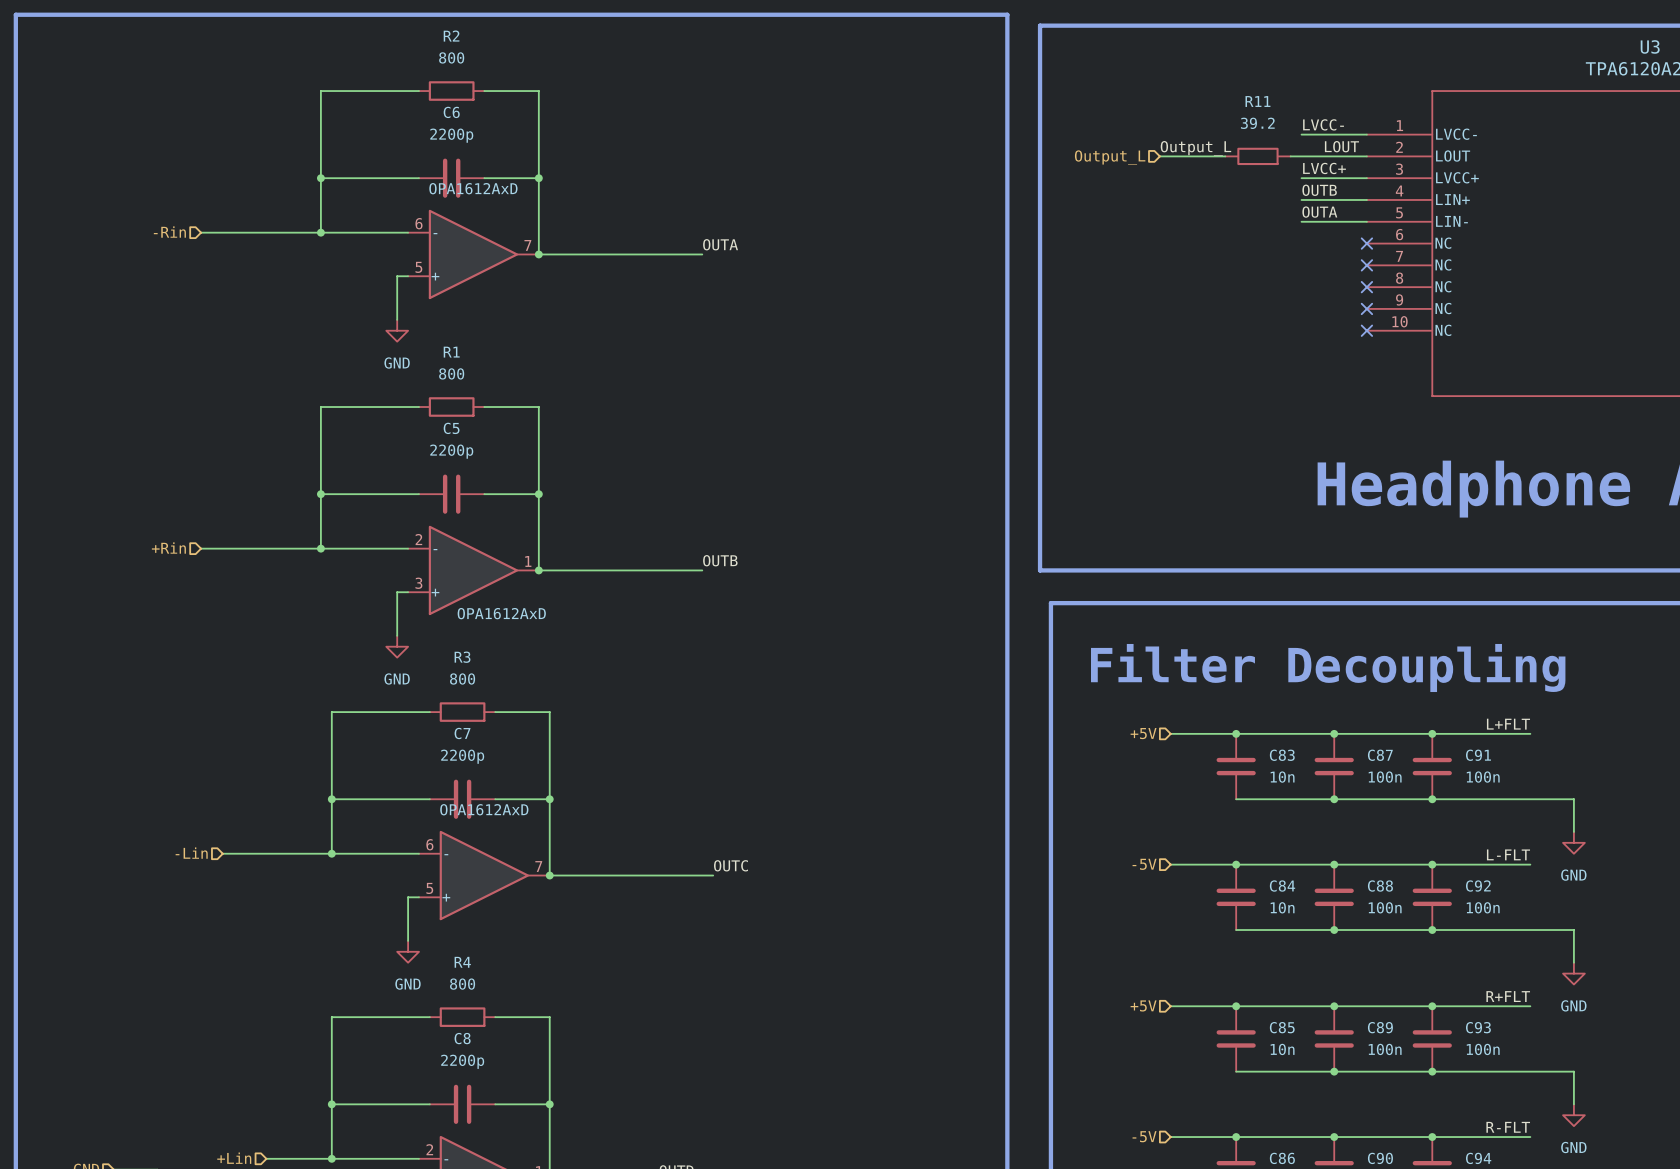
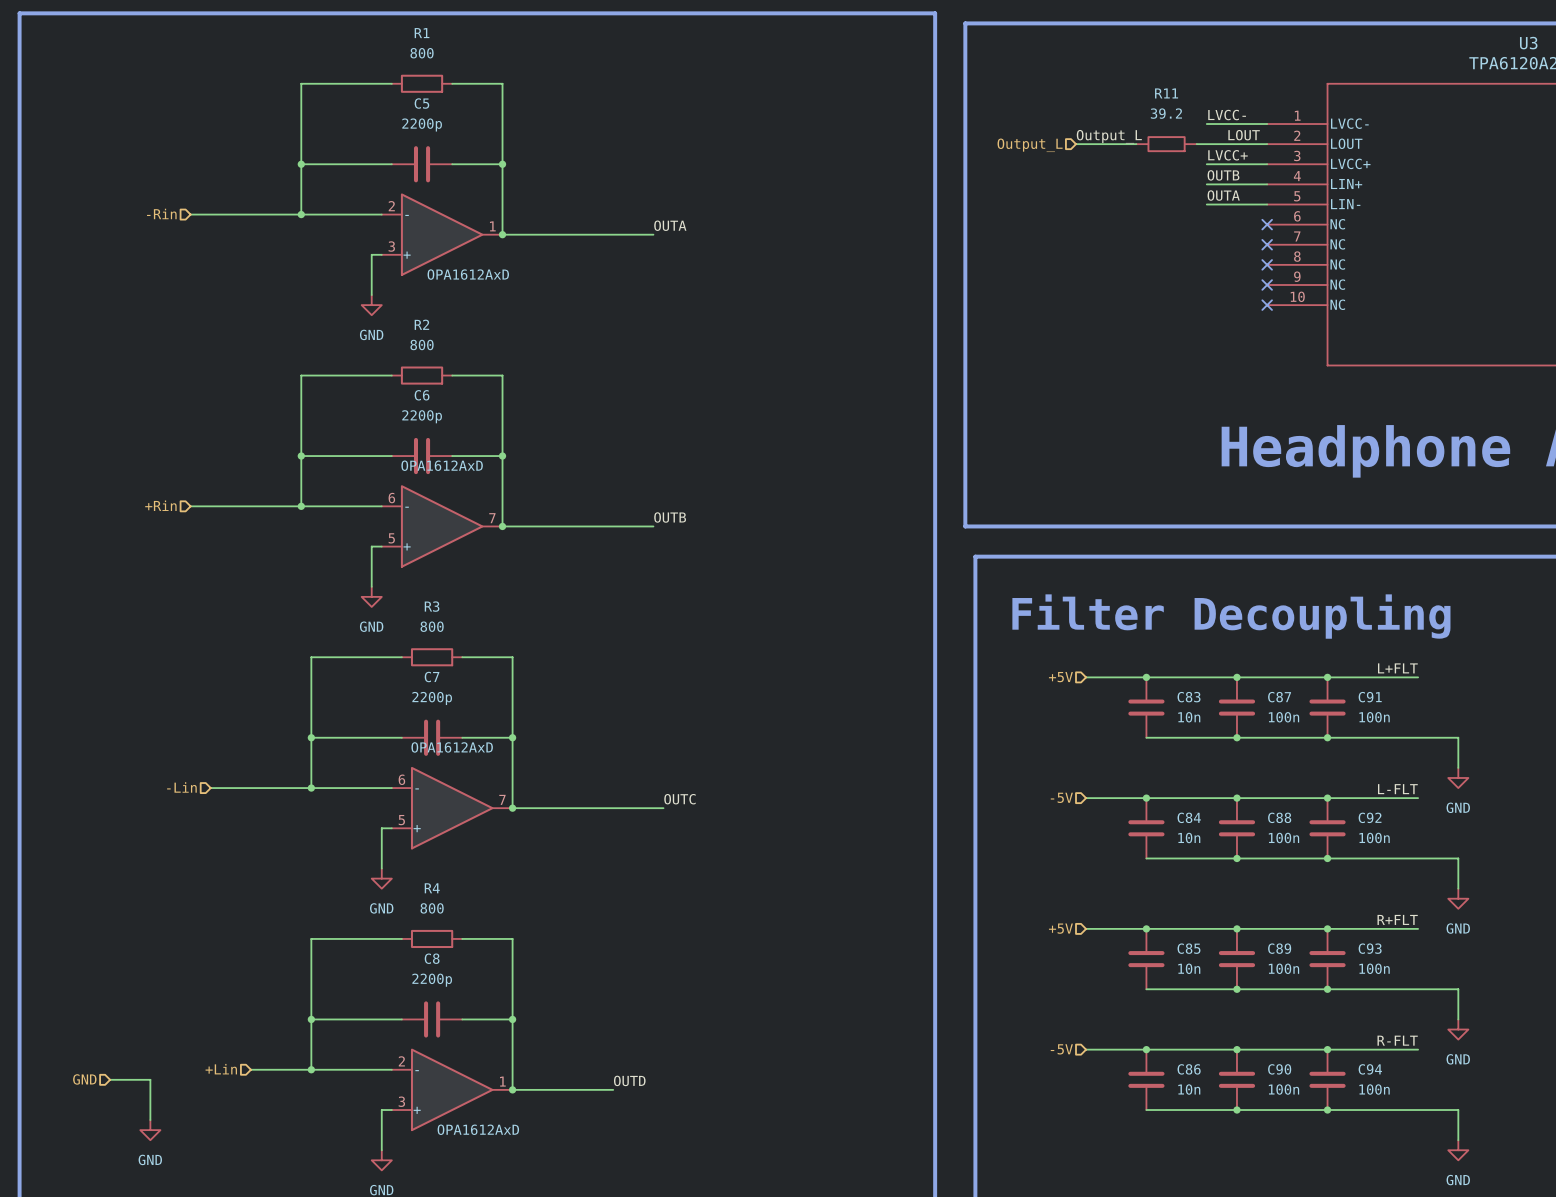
R2 name: R2 (451, 36) -> R1 (422, 33)
C6 name: C6 (451, 112) -> C5 (421, 103)
part value position: OPA1612AxD (473, 188) -> OPA1612AxD (468, 274)
part pin number: 6 (418, 223) -> 2 (391, 206)
part pin number: 7 (527, 245) -> 1 (492, 226)
part pin number: 5 (418, 267) -> 3 (391, 246)
R1 name: R1 (451, 352) -> R2 (421, 324)
C5 name: C5 (451, 428) -> C6 (422, 395)
part pin number: 2 (418, 539) -> 6 (391, 498)
part pin number: 1 (528, 561) -> 7 (492, 518)
part pin number: 3 (418, 583) -> 5 (391, 538)
part value position: OPA1612AxD (501, 613) -> OPA1612AxD (442, 465)

